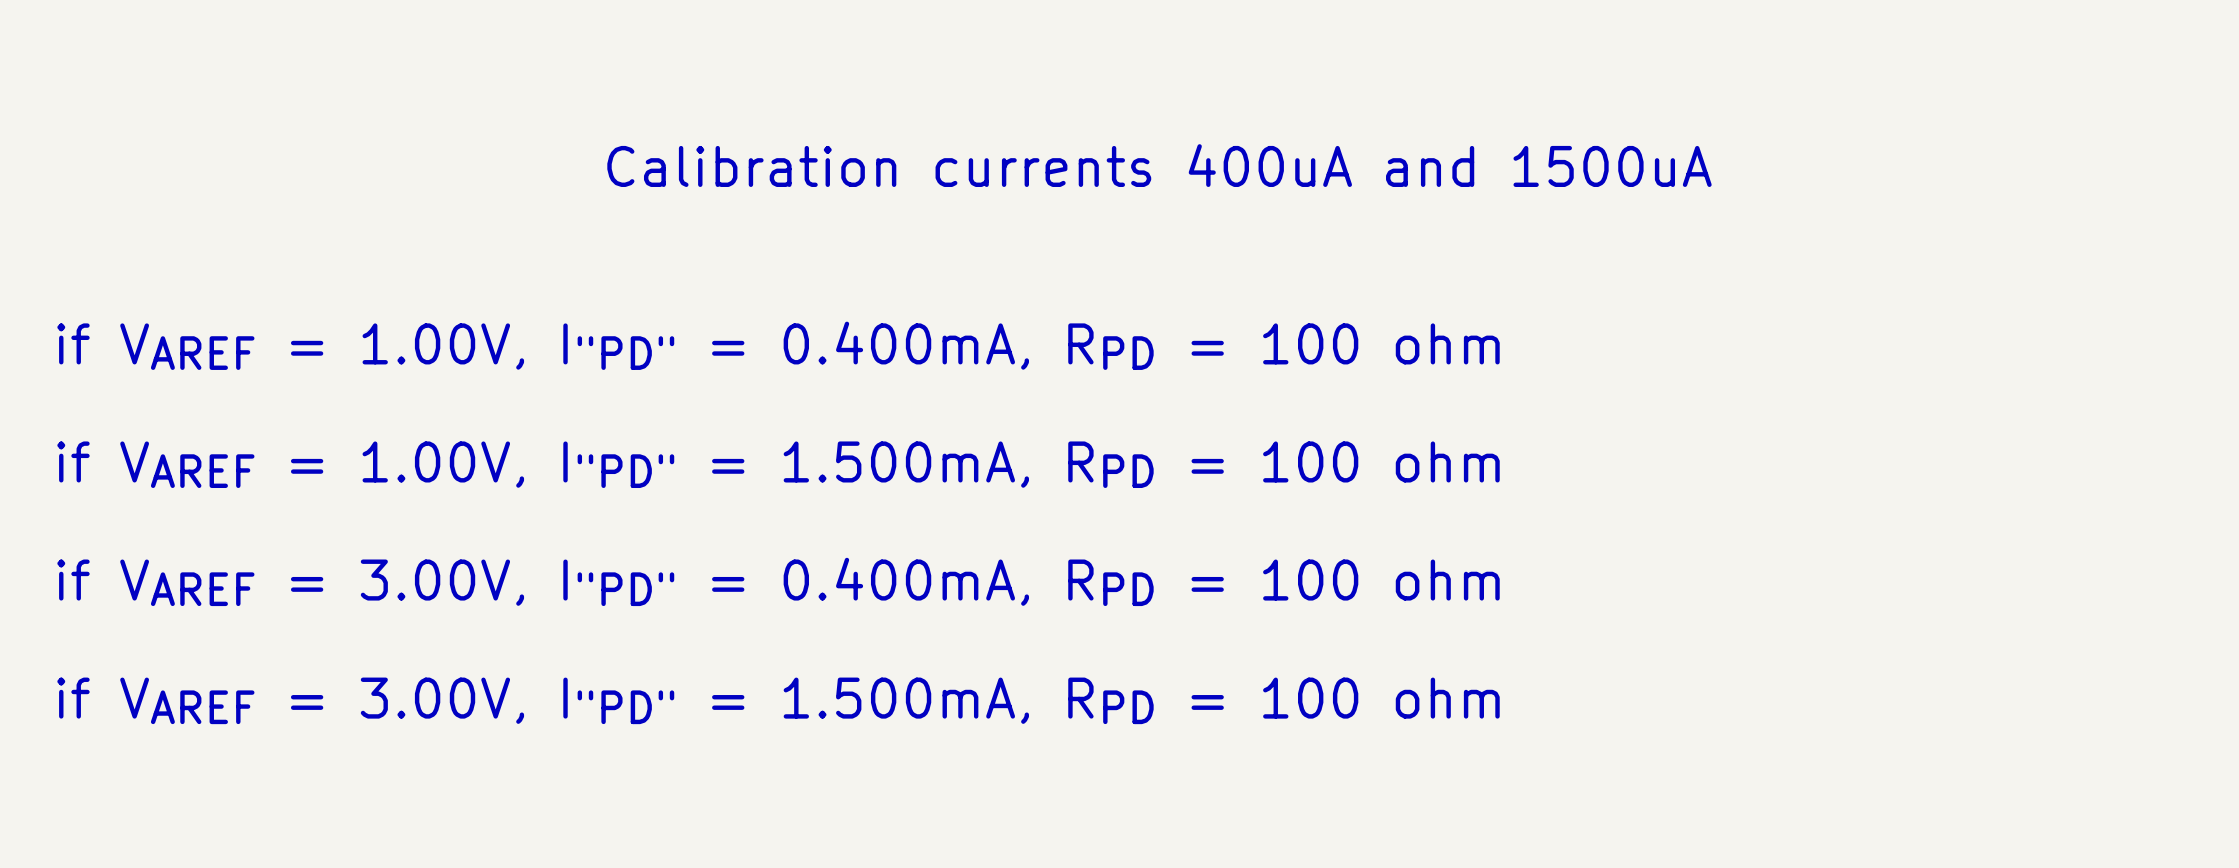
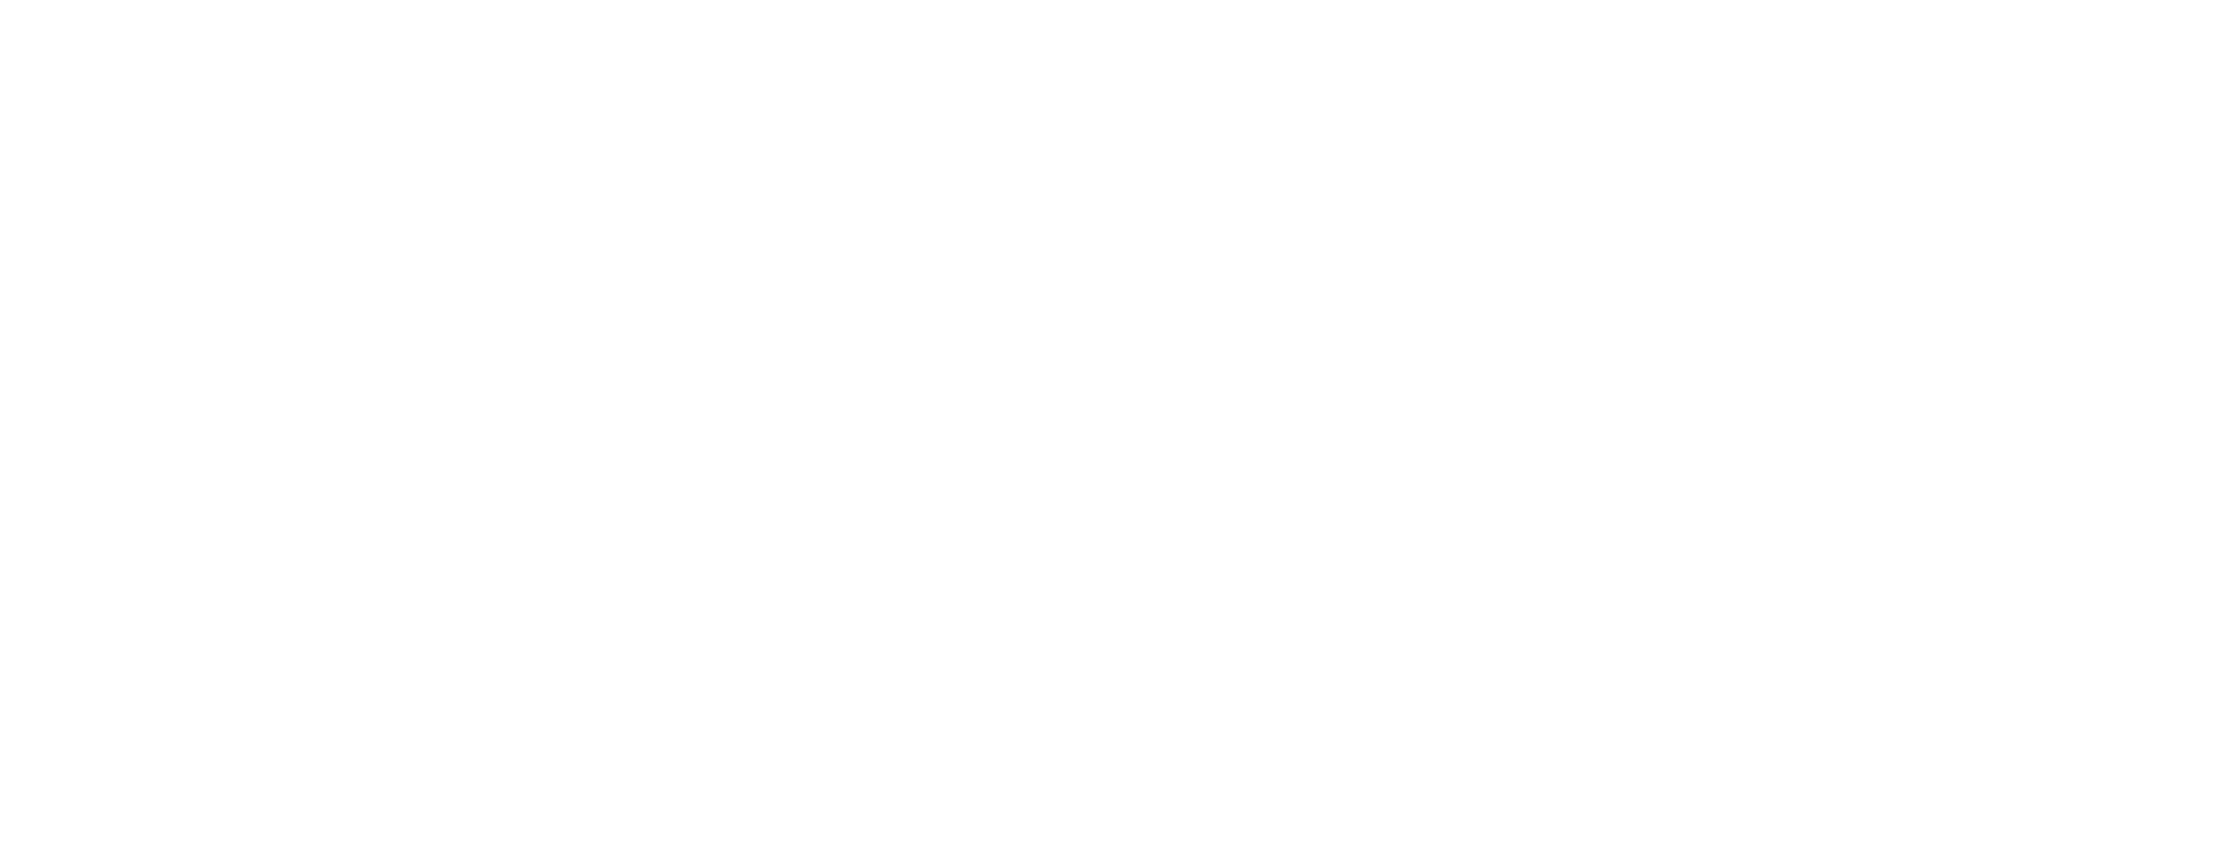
text: Calibration currents 400uA and 1500uA (1159, 165) -> none
text: if VAREF = 1.00V, I"PD" = 0.400mA, RPD = 100 ohm (778, 345) -> none
text: if VAREF = 1.00V, I"PD" = 1.500mA, RPD = 100 ohm (778, 464) -> none
text: if VAREF = 3.00V, I"PD" = 0.400mA, RPD = 100 ohm (778, 581) -> none
text: if VAREF = 3.00V, I"PD" = 1.500mA, RPD = 100 ohm (778, 700) -> none

